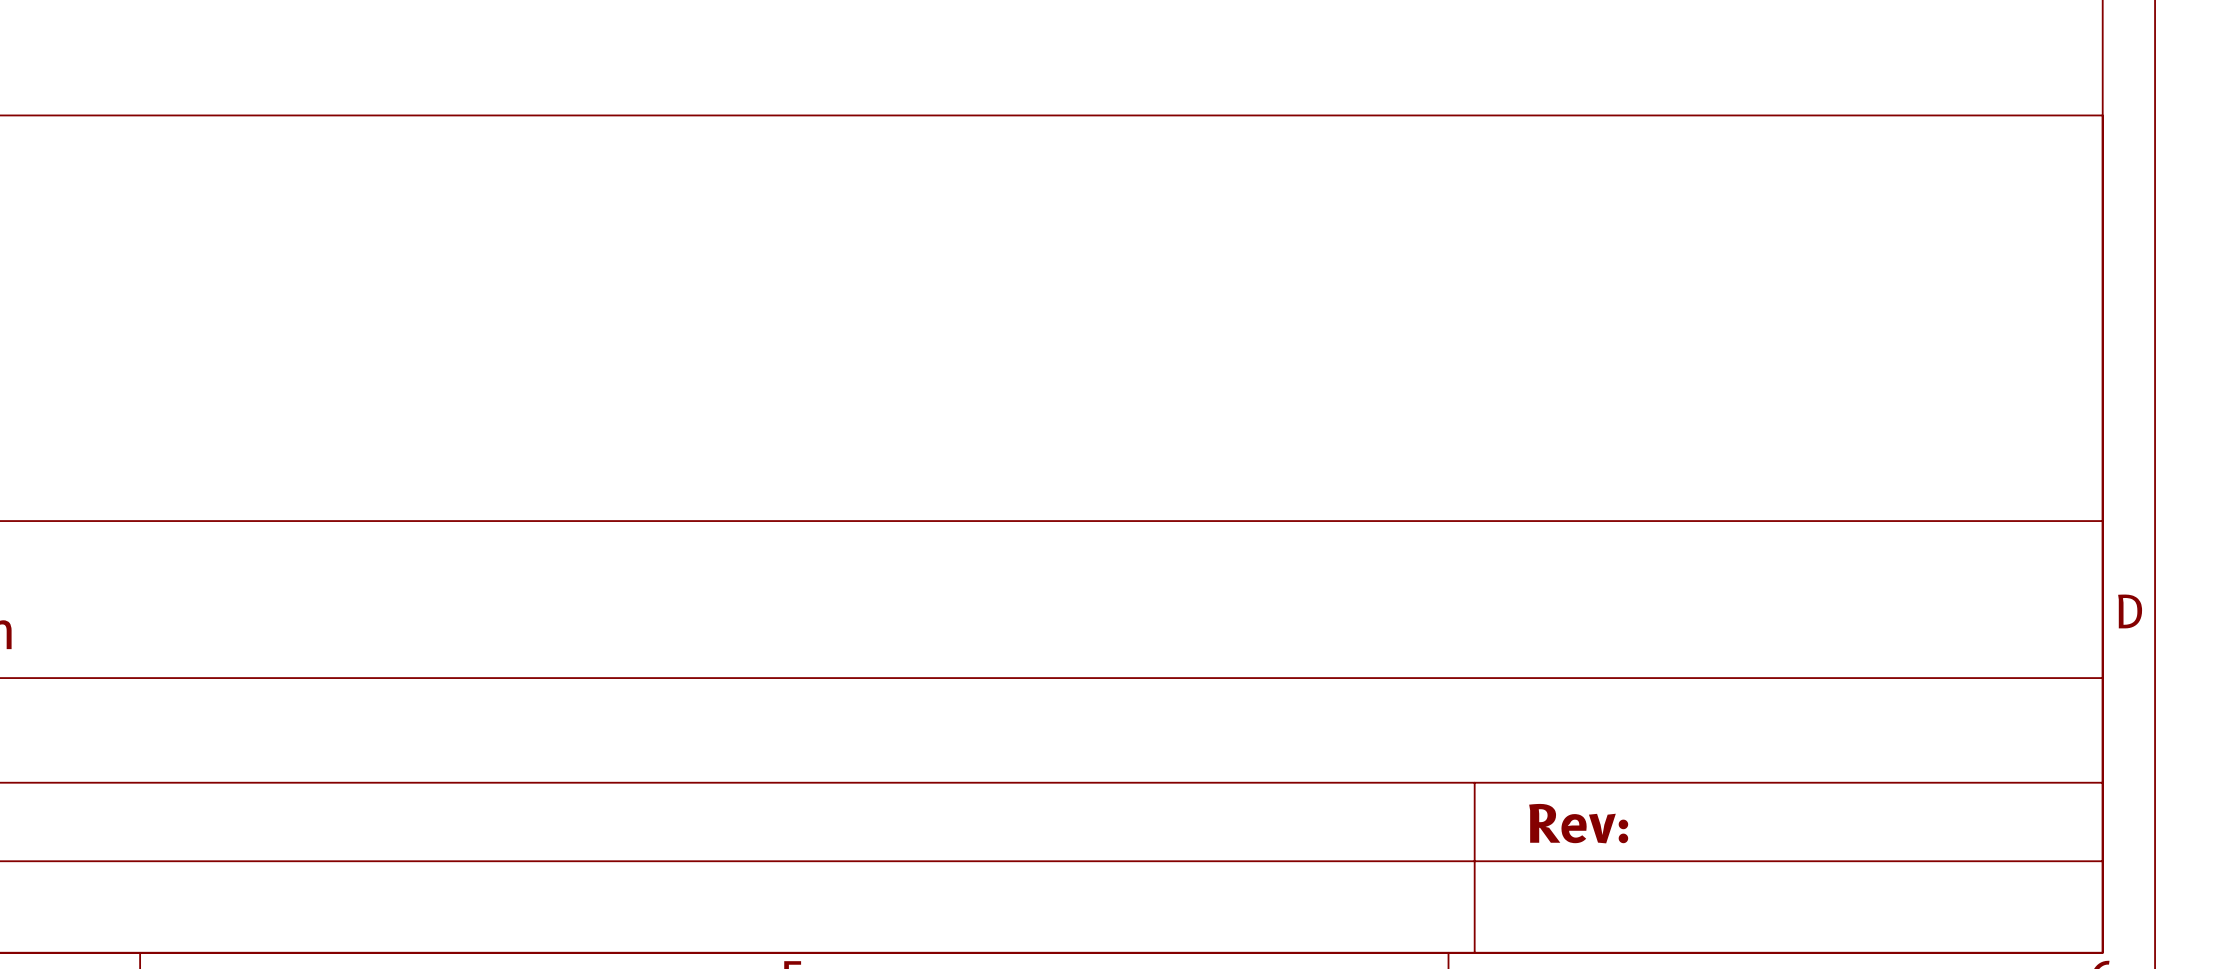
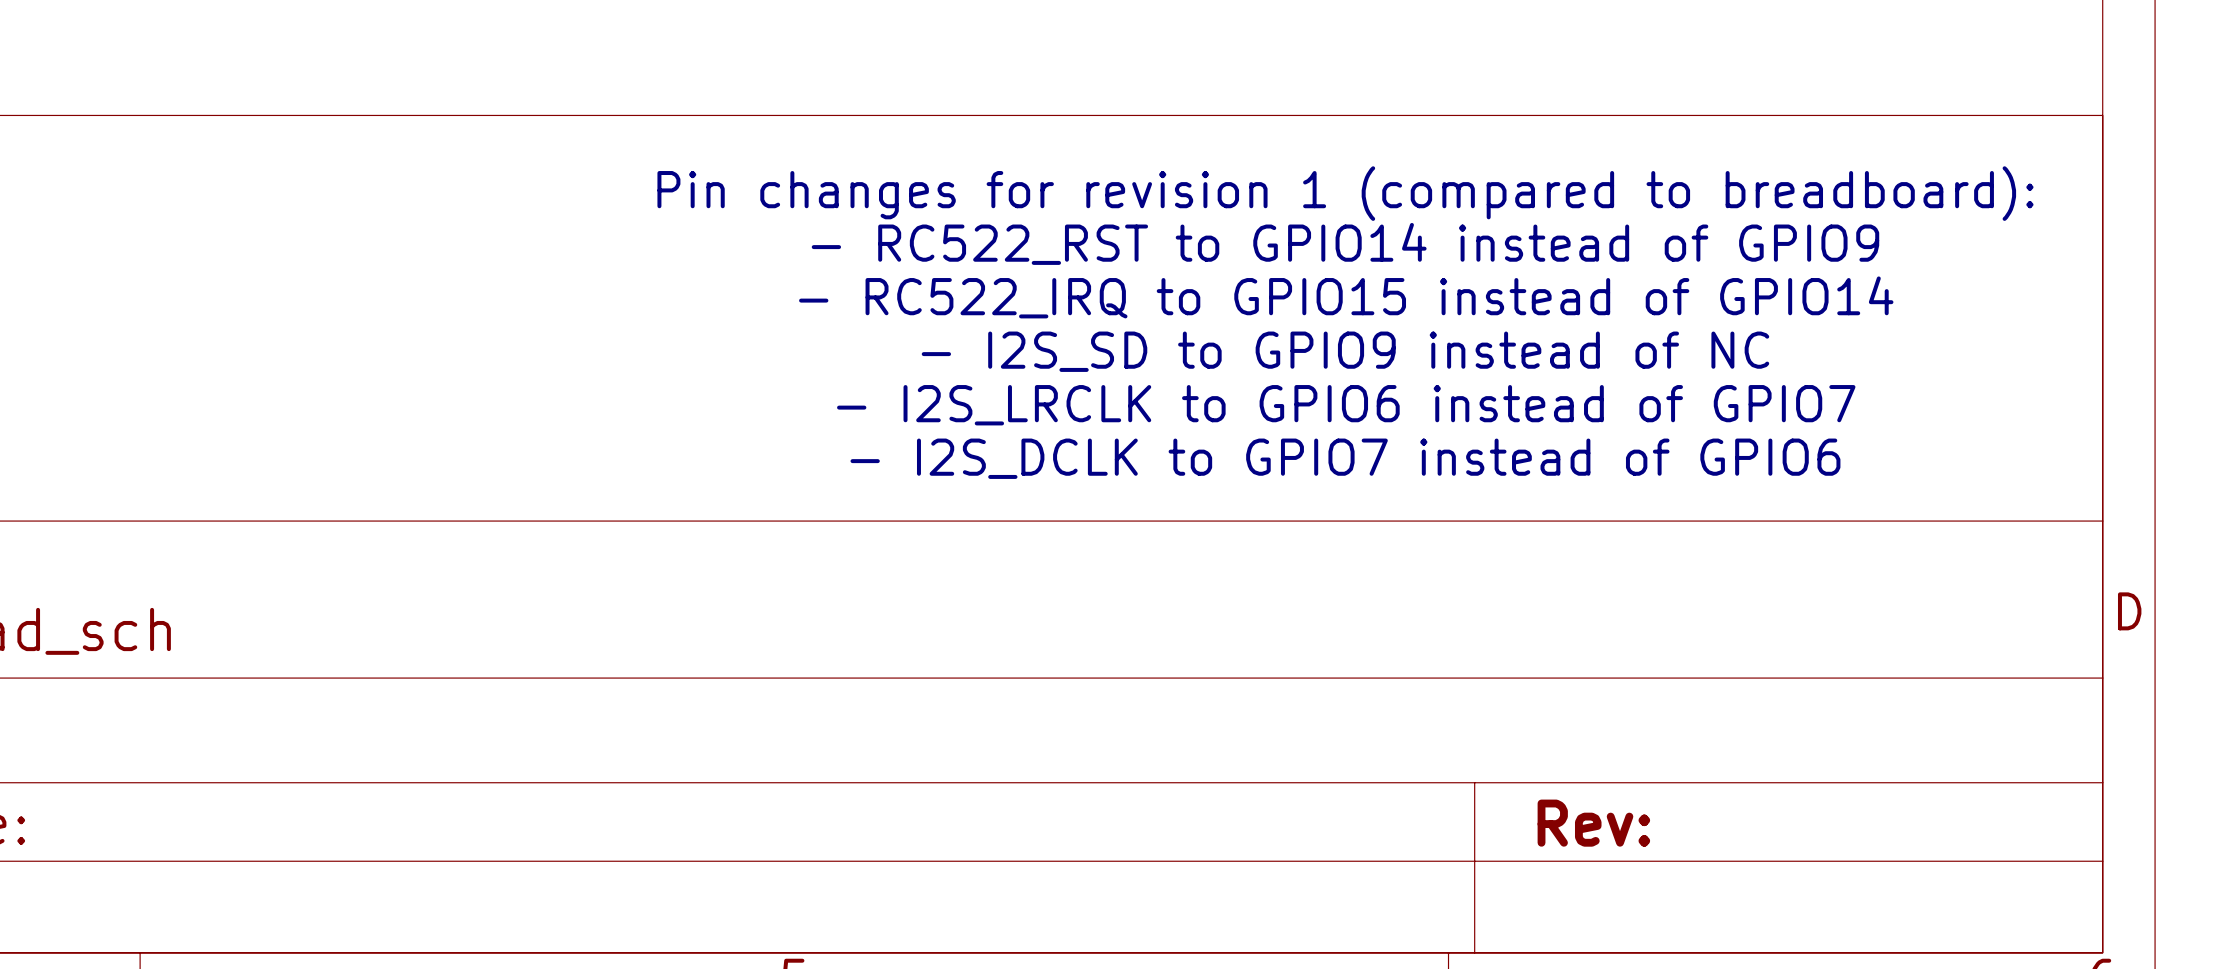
text: none -> Pin changes for revision 1 (compared to breadboard): (1345, 193)
text: none -> - RC522_RST to GPIO14 instead of GPIO9 (1345, 243)
text: none -> - RC522_IRQ to GPIO15 instead of GPIO14 (1346, 297)
text: none -> - I2S_SD to GPIO9 instead of NC (1345, 351)
text: none -> - I2S_LRCLK to GPIO6 instead of GPIO7 (1346, 405)
text: none -> - I2S_DCLK to GPIO7 instead of GPIO6 (1345, 458)

